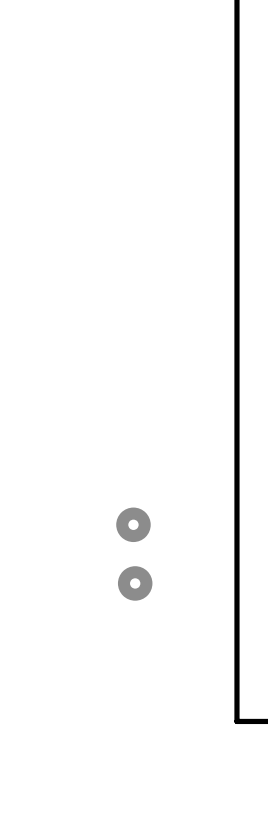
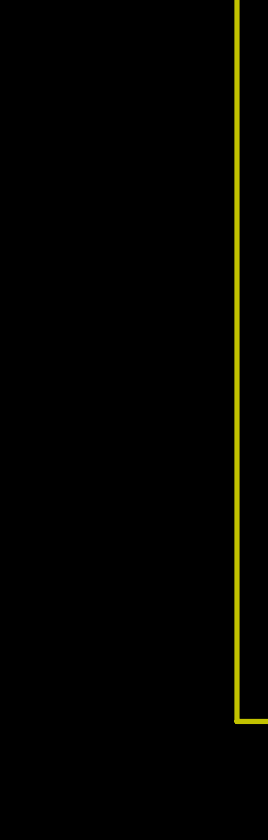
via: (133, 524) -> none
via: (135, 583) -> none

